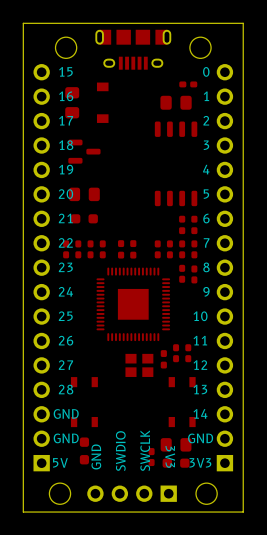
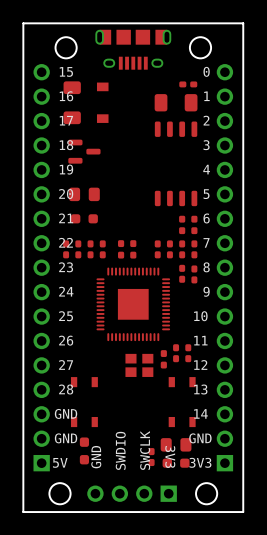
part footprint: [65, 87, 80, 119] -> [63, 81, 81, 125]
part footprint: [160, 95, 192, 110] -> [154, 94, 198, 112]

